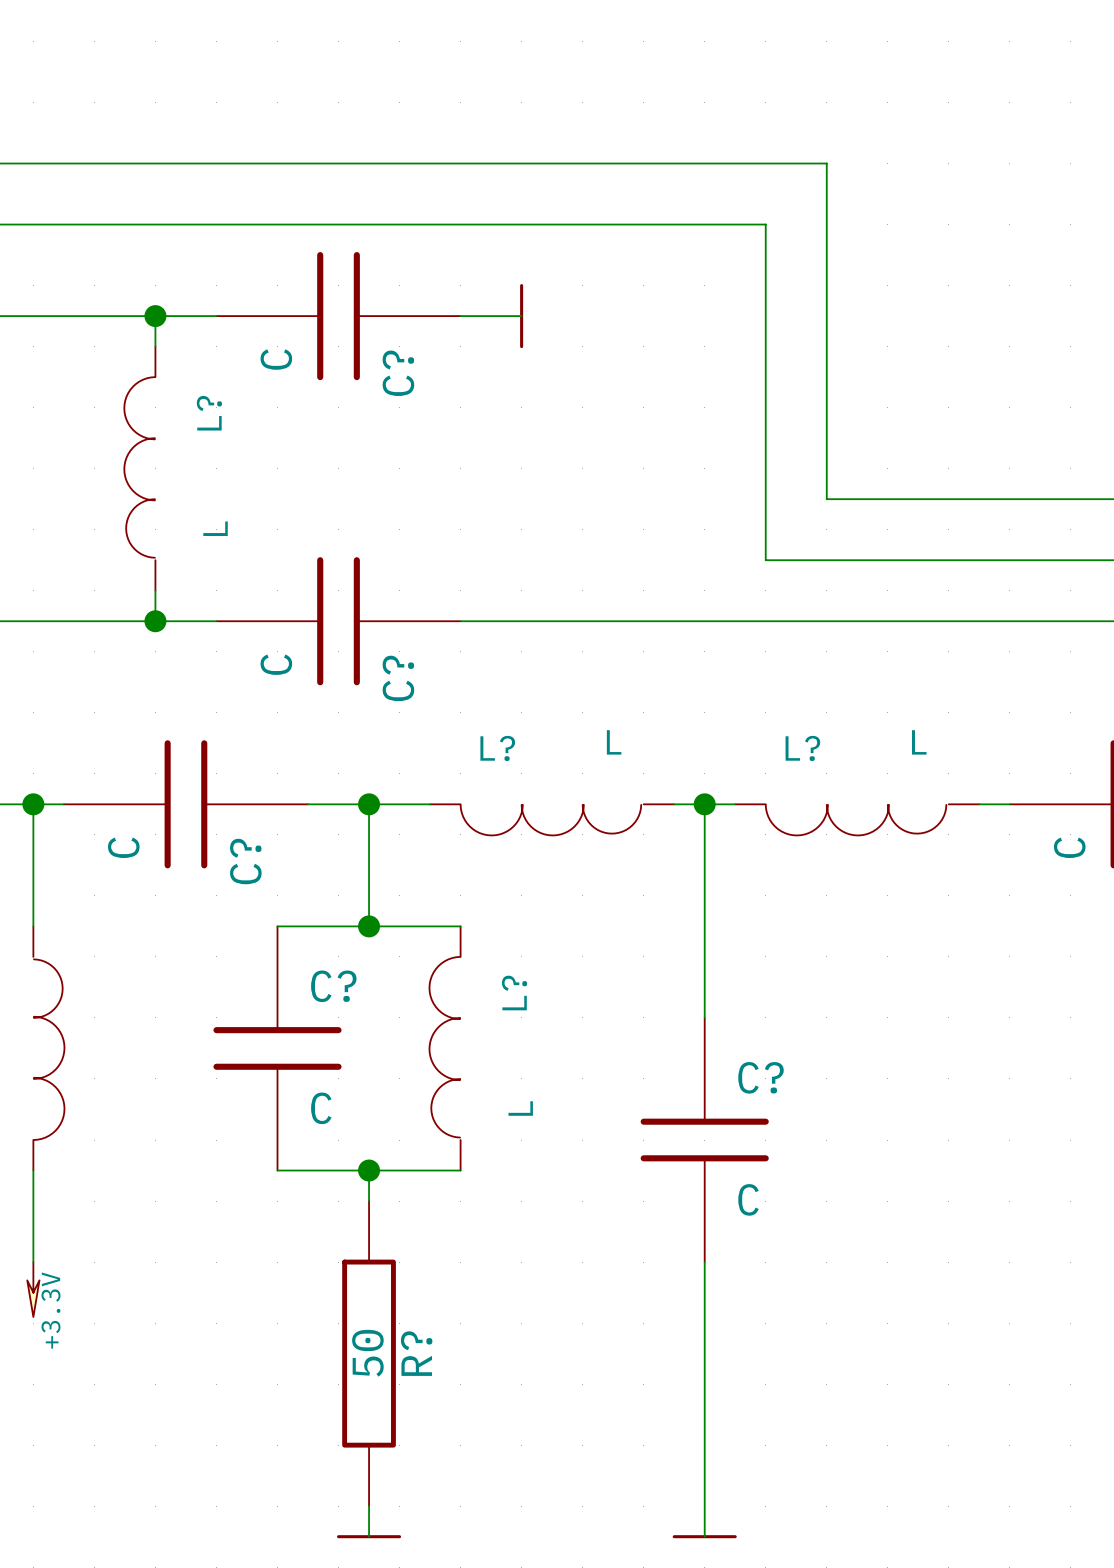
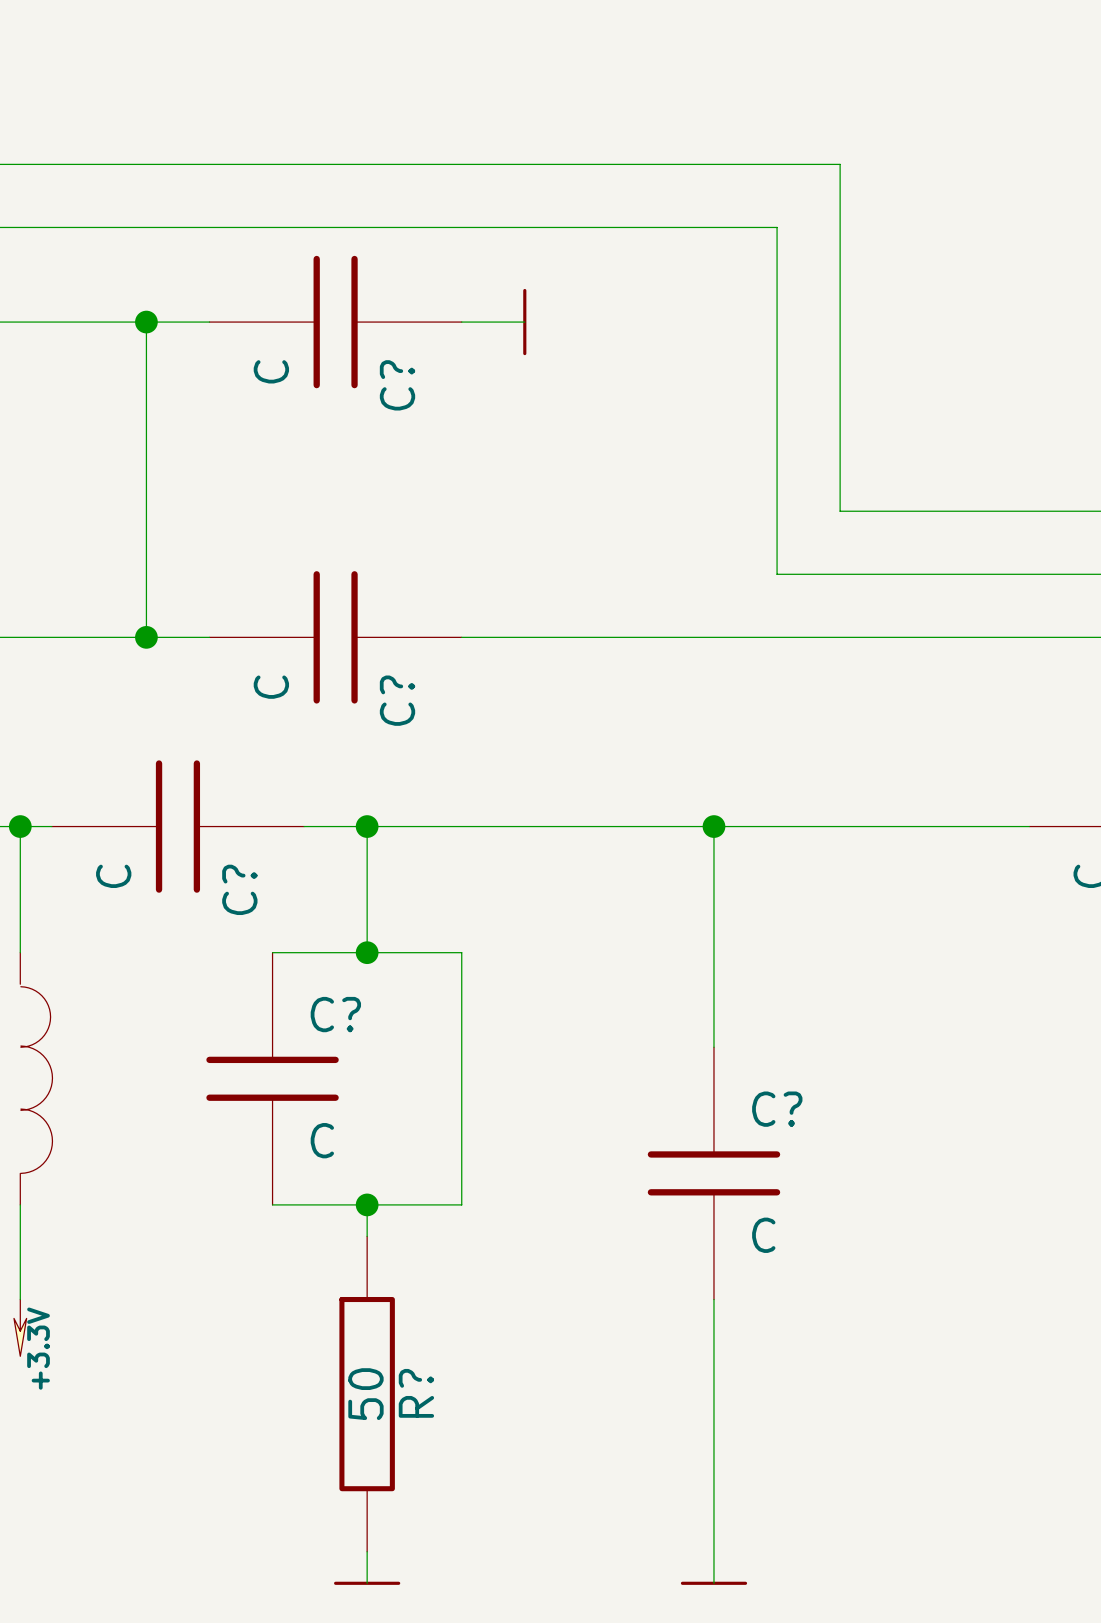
wire: none -> (146, 353) (146, 605)
L?: L (139, 468) -> none
wire: none -> (430, 826) (682, 826)
wire: none -> (745, 826) (997, 826)
L?: L (552, 819) -> none
L?: L (857, 819) -> none
wire: none -> (461, 952) (461, 1204)
L?: L (445, 1048) -> none

